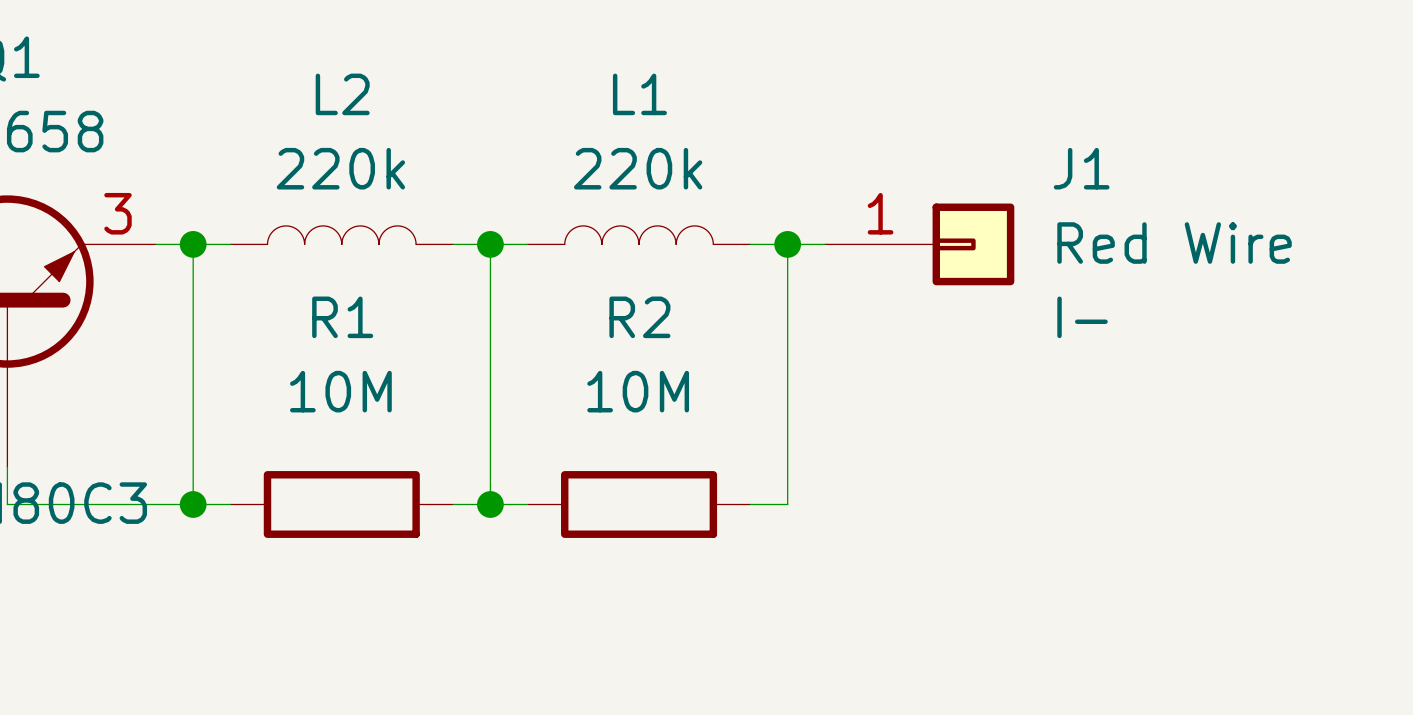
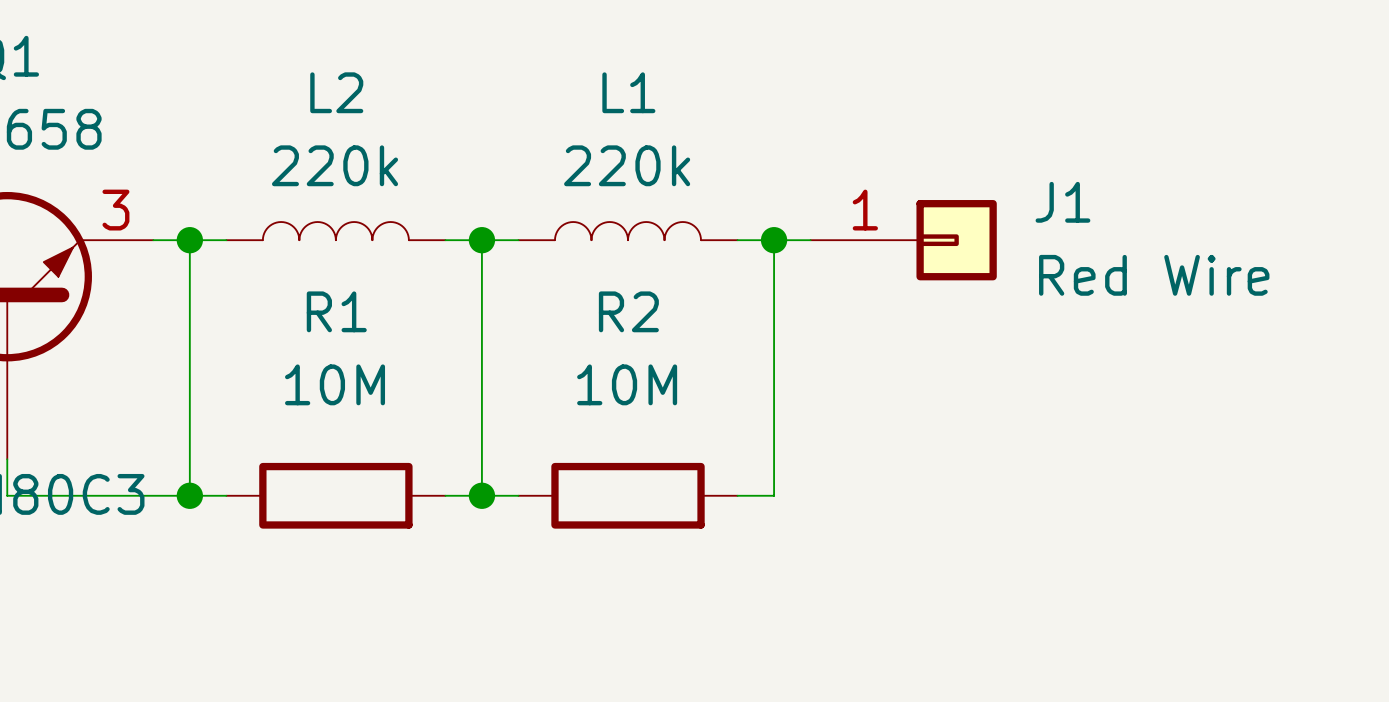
J1 name position: J1 (1081, 168) -> J1 (1062, 202)
J1 value position: Red Wire (1174, 243) -> Red Wire (1154, 275)
J1 text: I- (1082, 317) -> none

